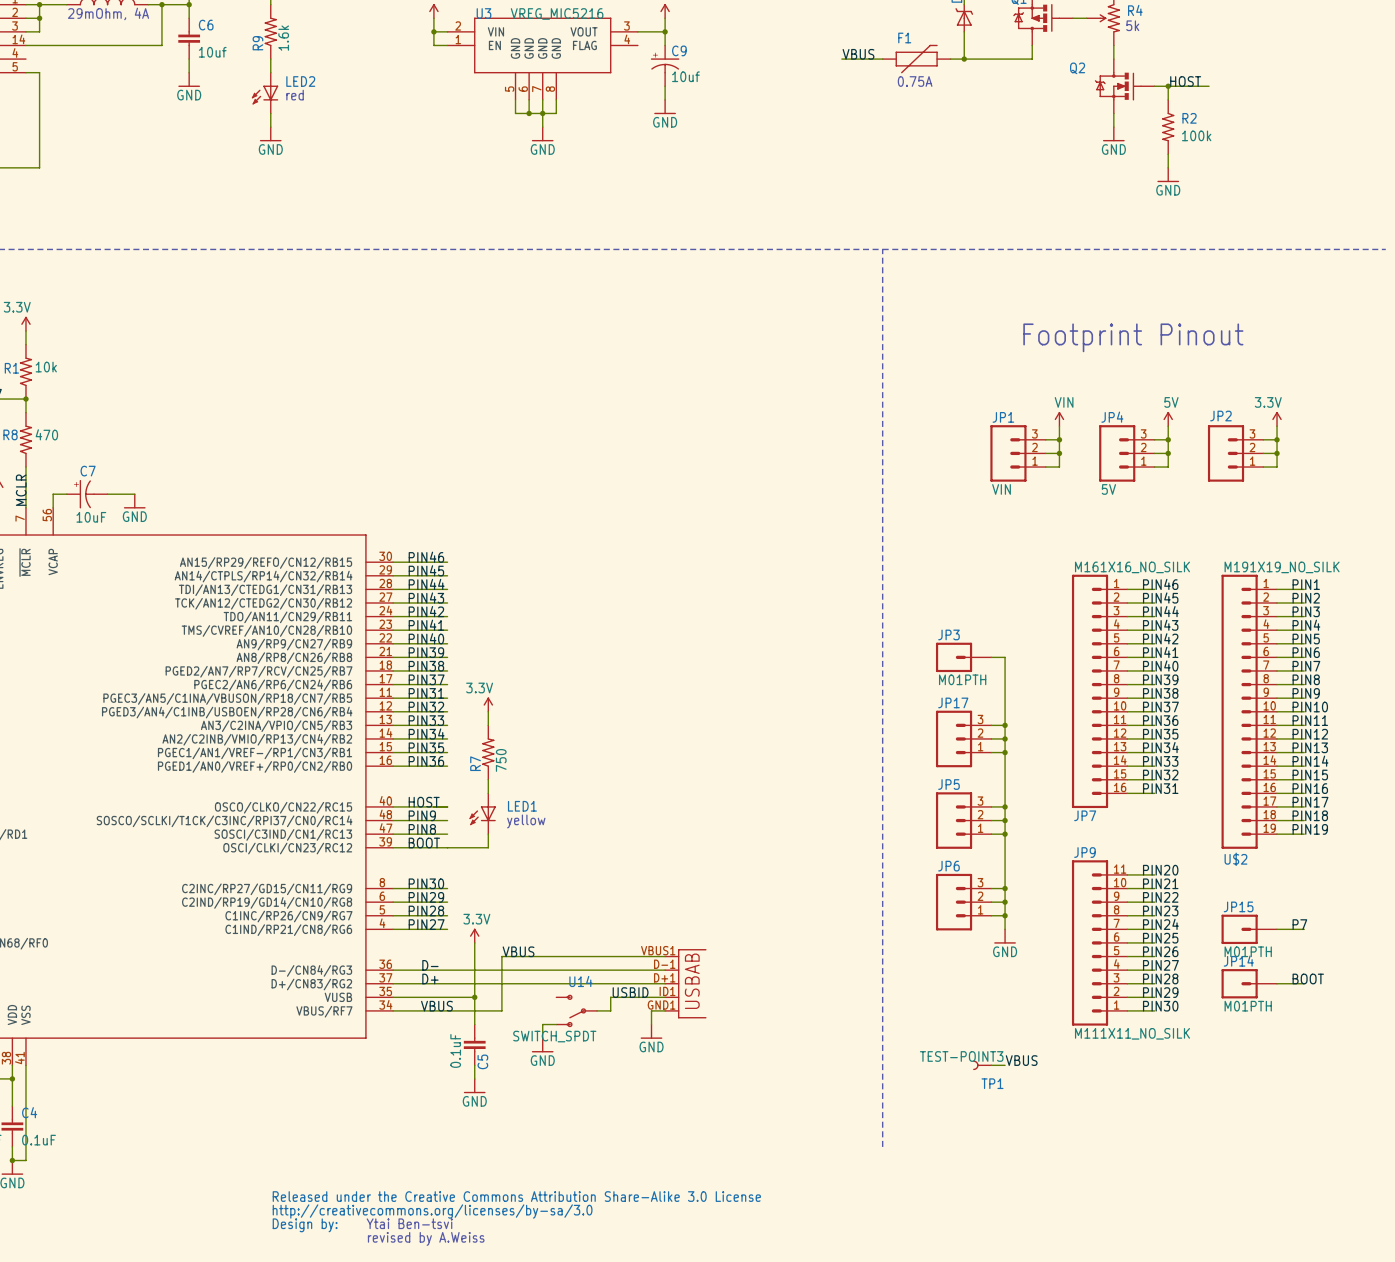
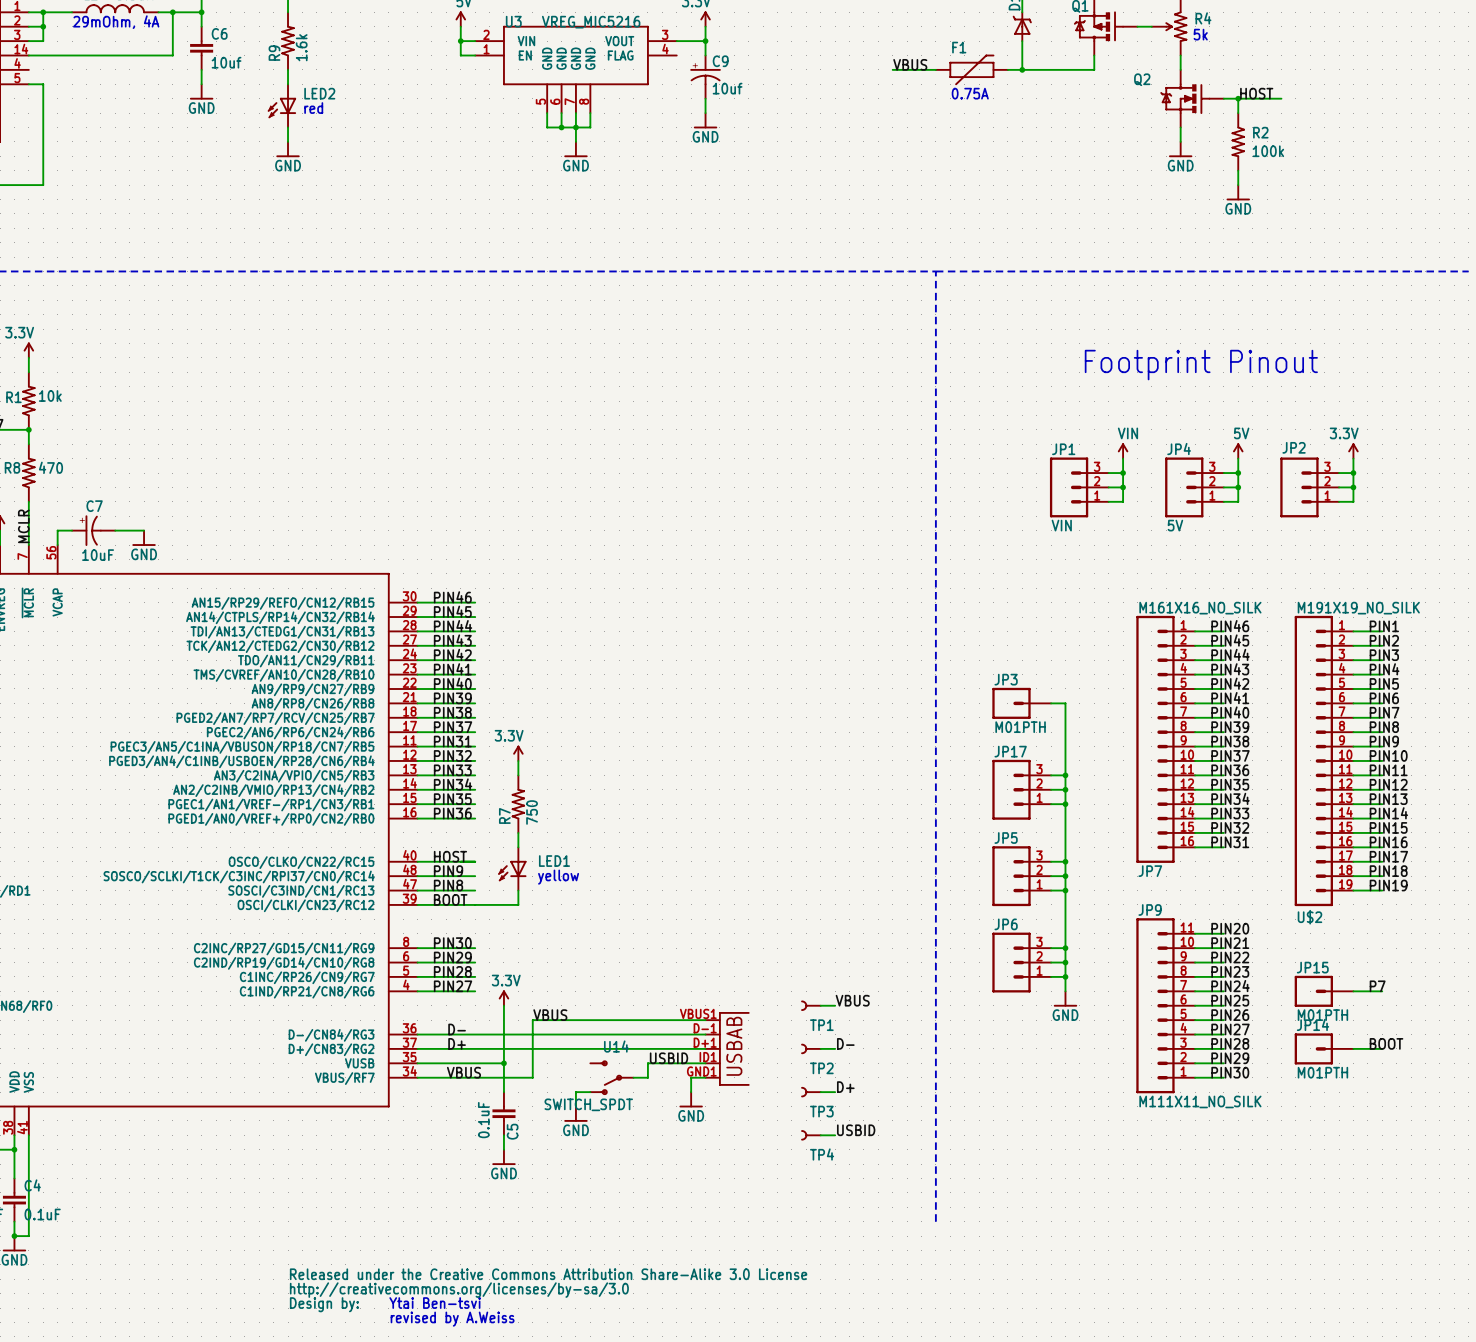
label: none -> VBUS (852, 1000)
wire: none -> (820, 1005) (835, 1005)
label: none -> D- (845, 1043)
TP2: none -> (811, 1048)
wire: none -> (820, 1048) (835, 1048)
label: none -> D+ (845, 1087)
TP3: none -> (811, 1092)
wire: none -> (820, 1092) (835, 1092)
TP1 value: TEST-POINT3 (961, 1056) -> none
label: none -> USBID (856, 1130)
label: VBUS (1021, 1060) -> none
TP4: none -> (811, 1135)
wire: none -> (820, 1135) (835, 1135)
TP1 position: (982, 1065) -> (811, 1005)
wire: (991, 1065) (1005, 1065) -> none

